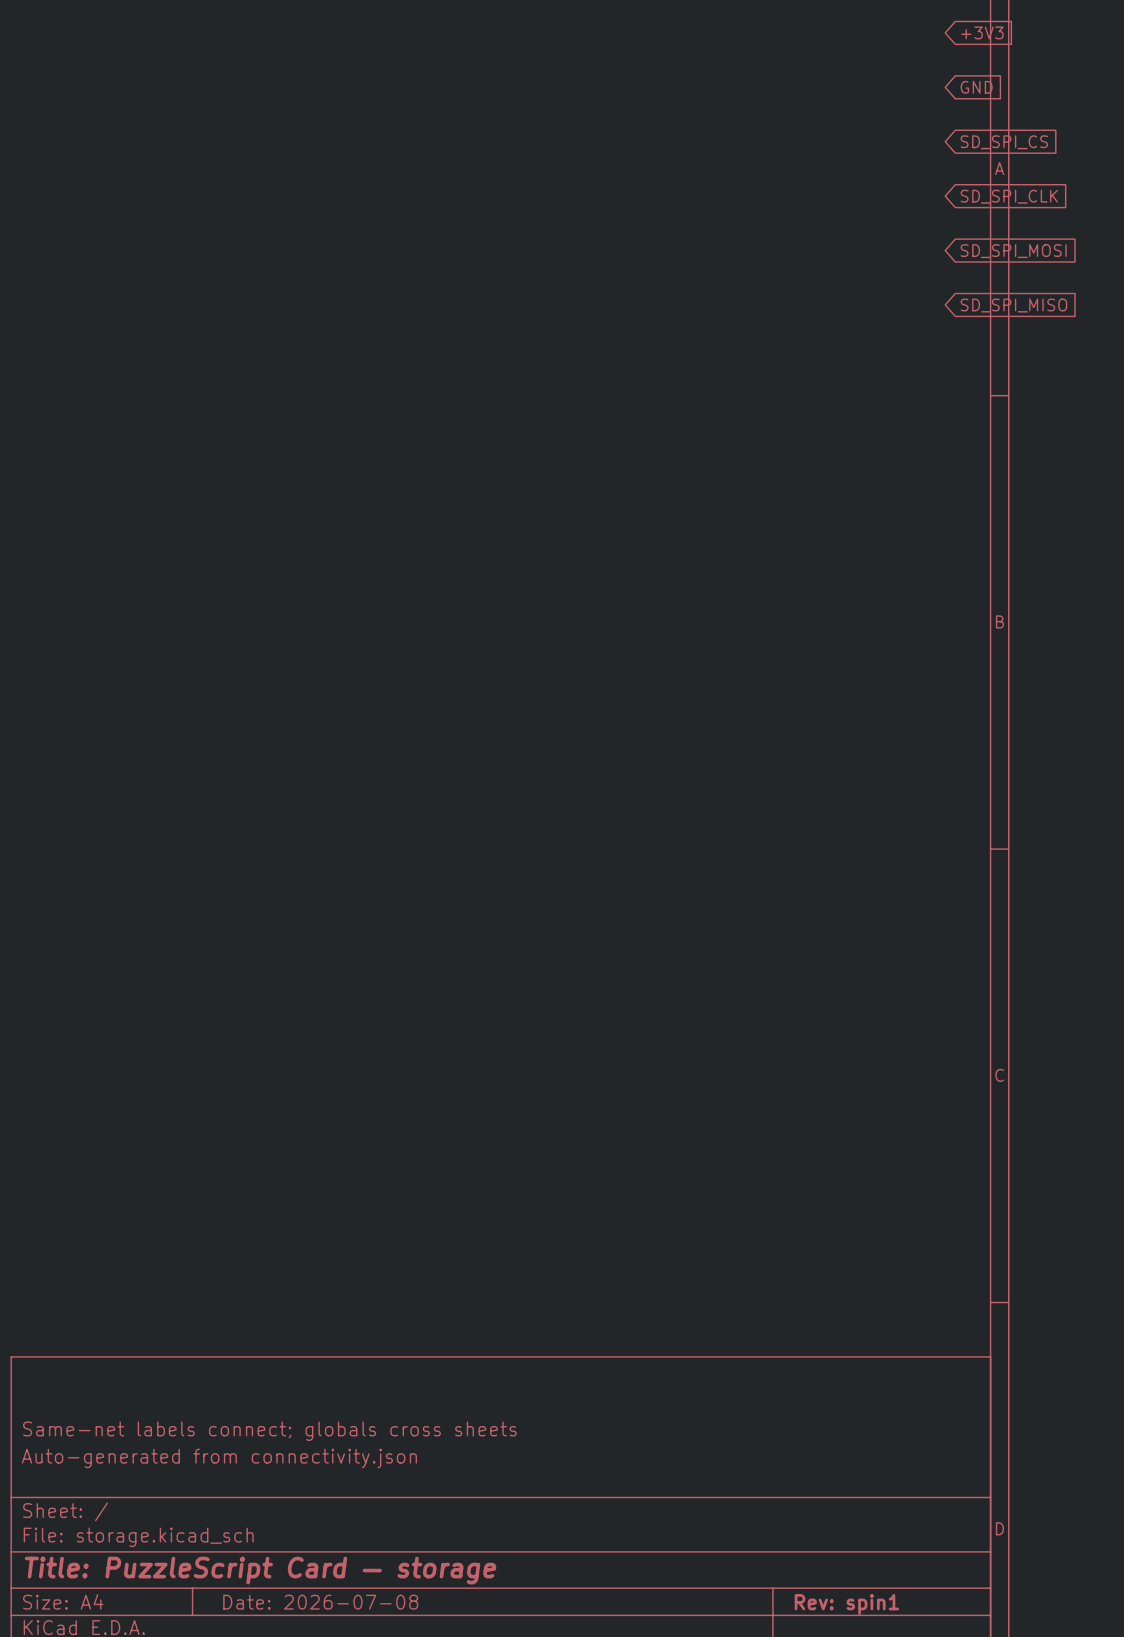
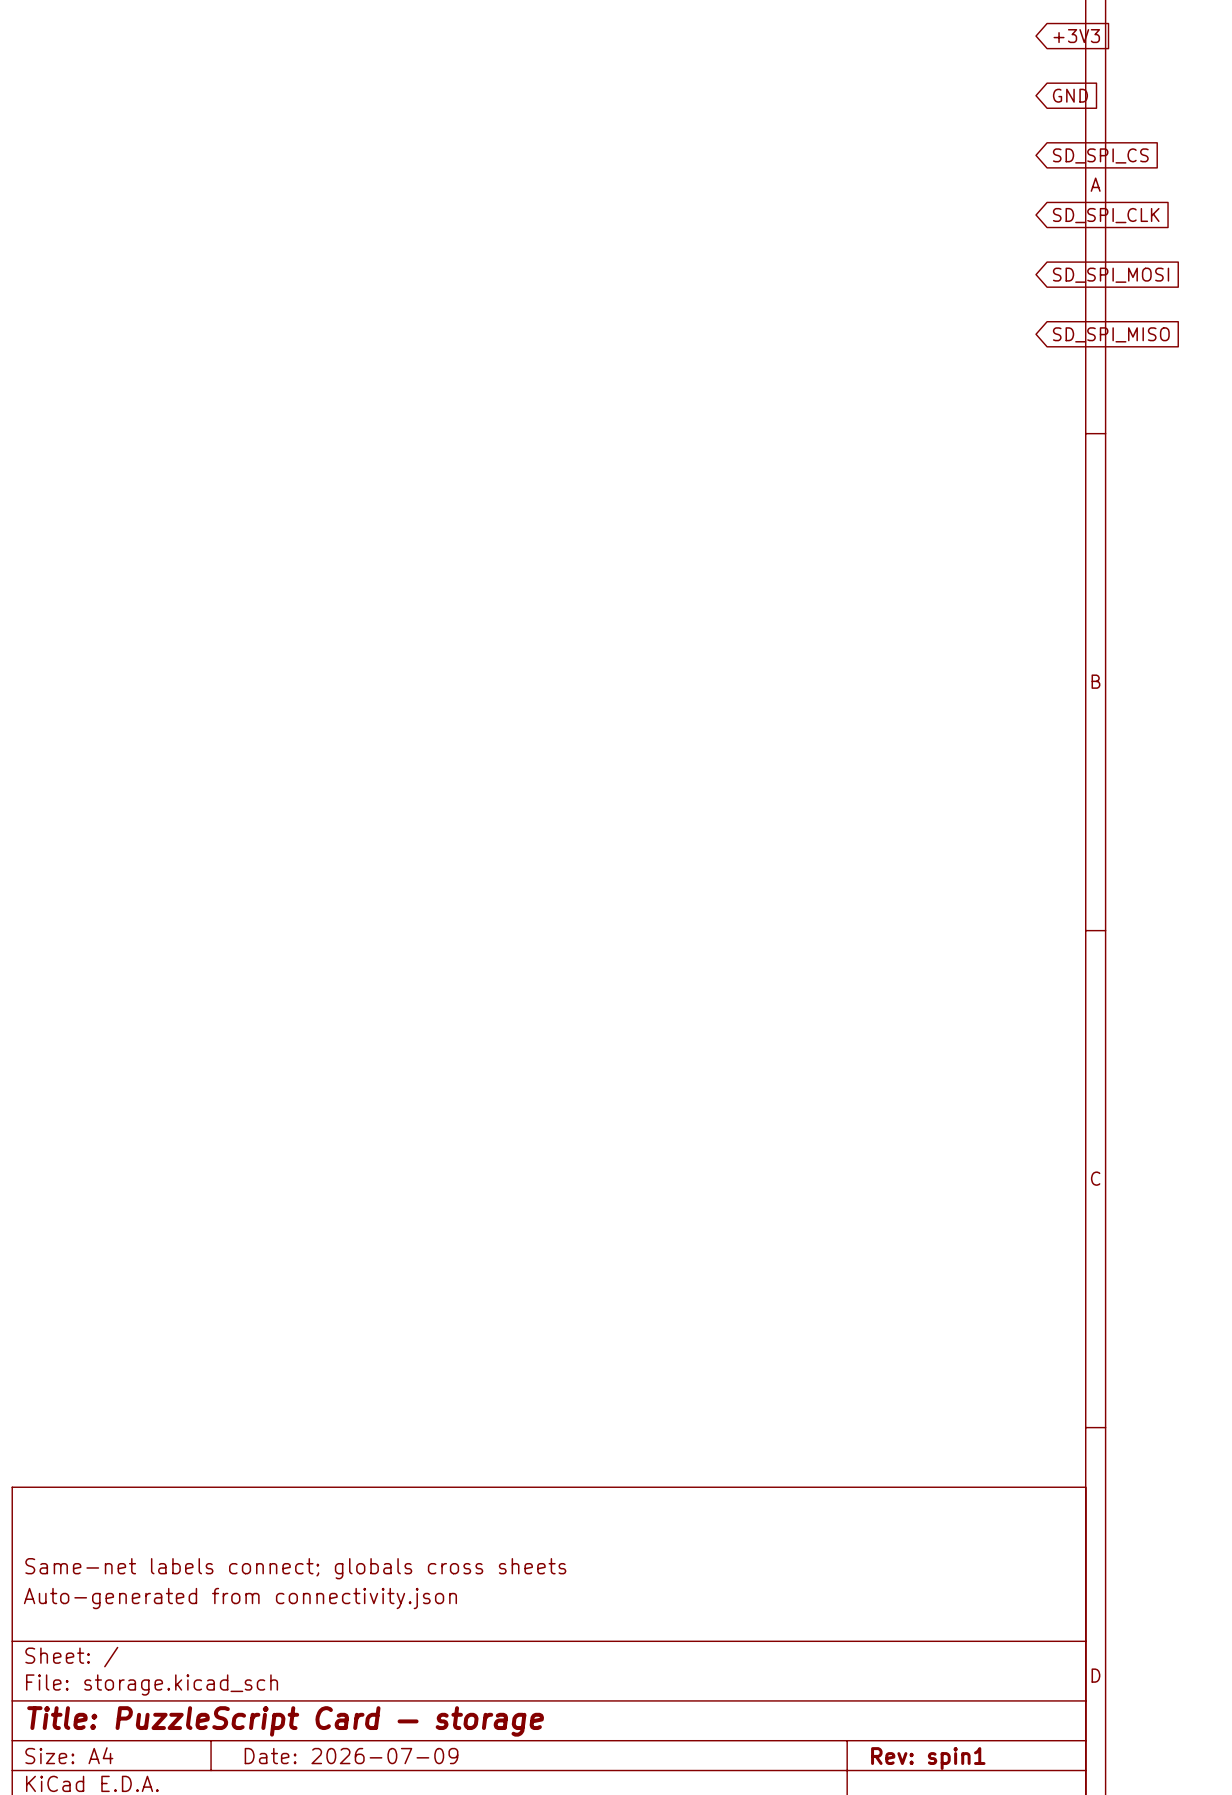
title block: Date: 2026-07-08 (320, 1602) -> Date: 2026-07-09 (351, 1756)

